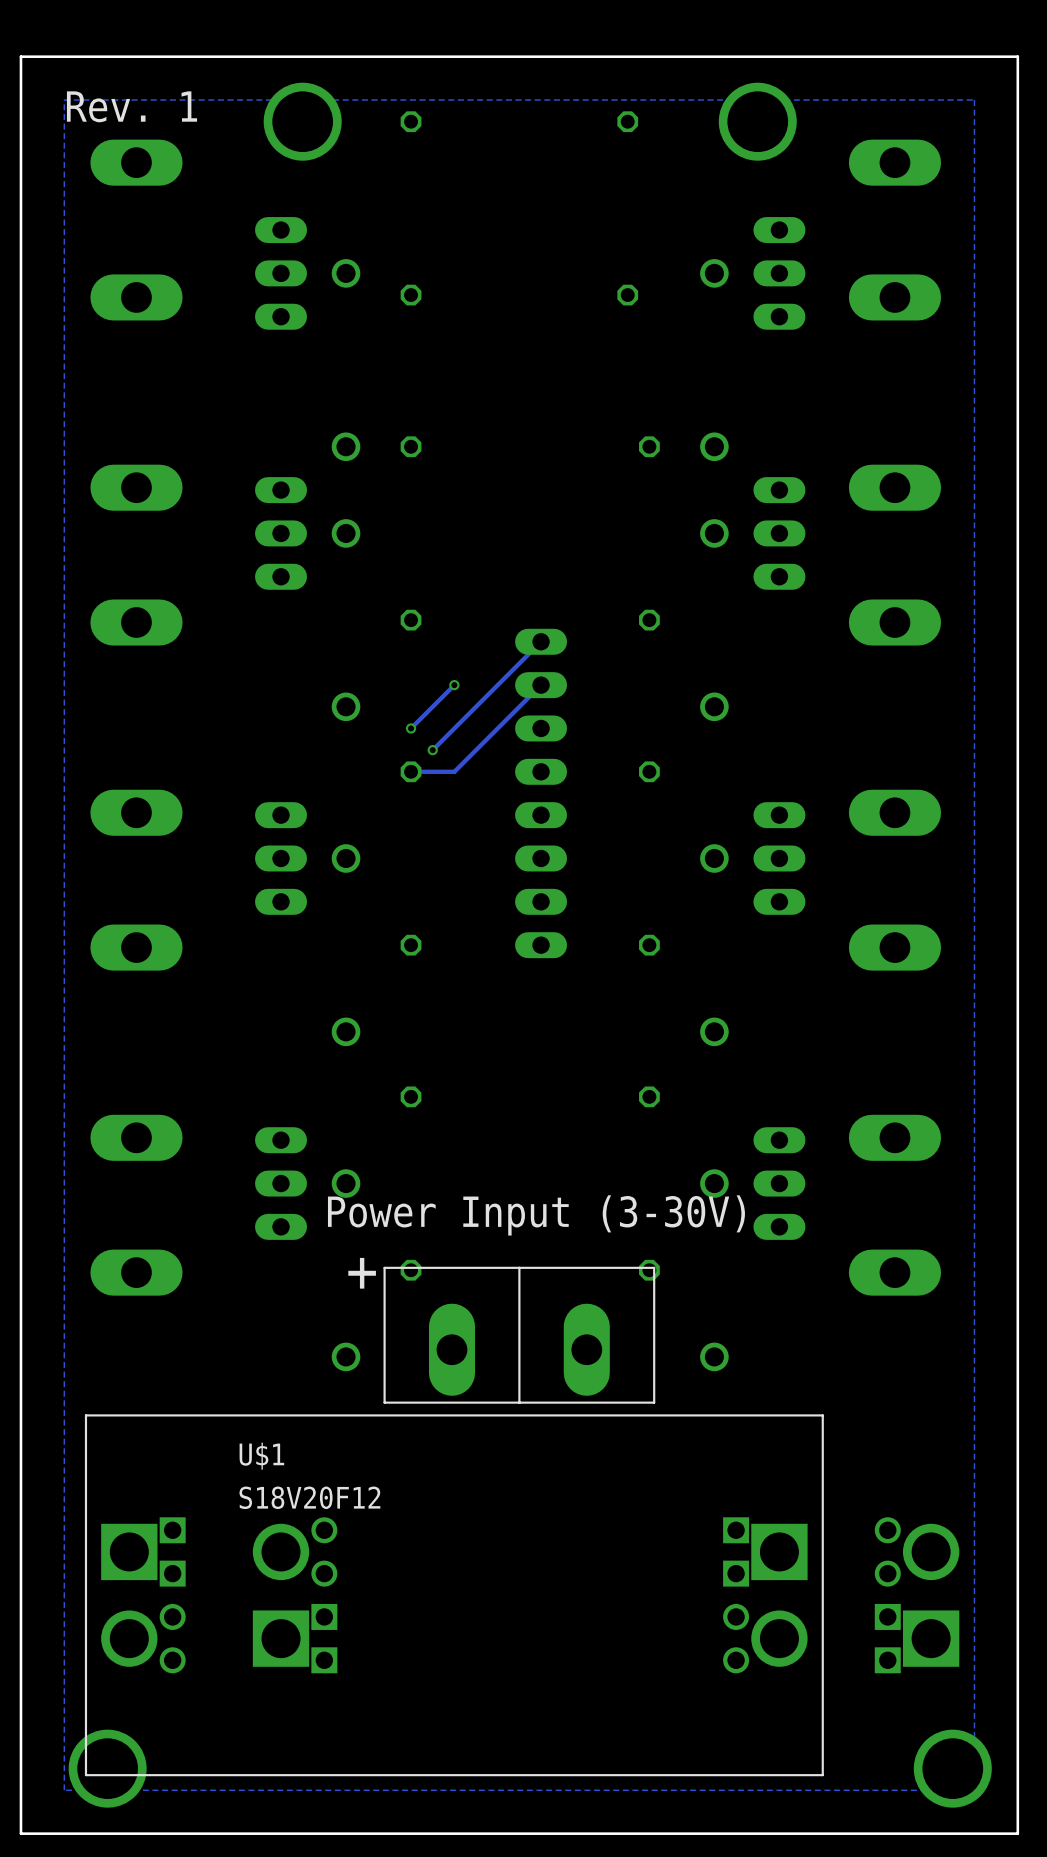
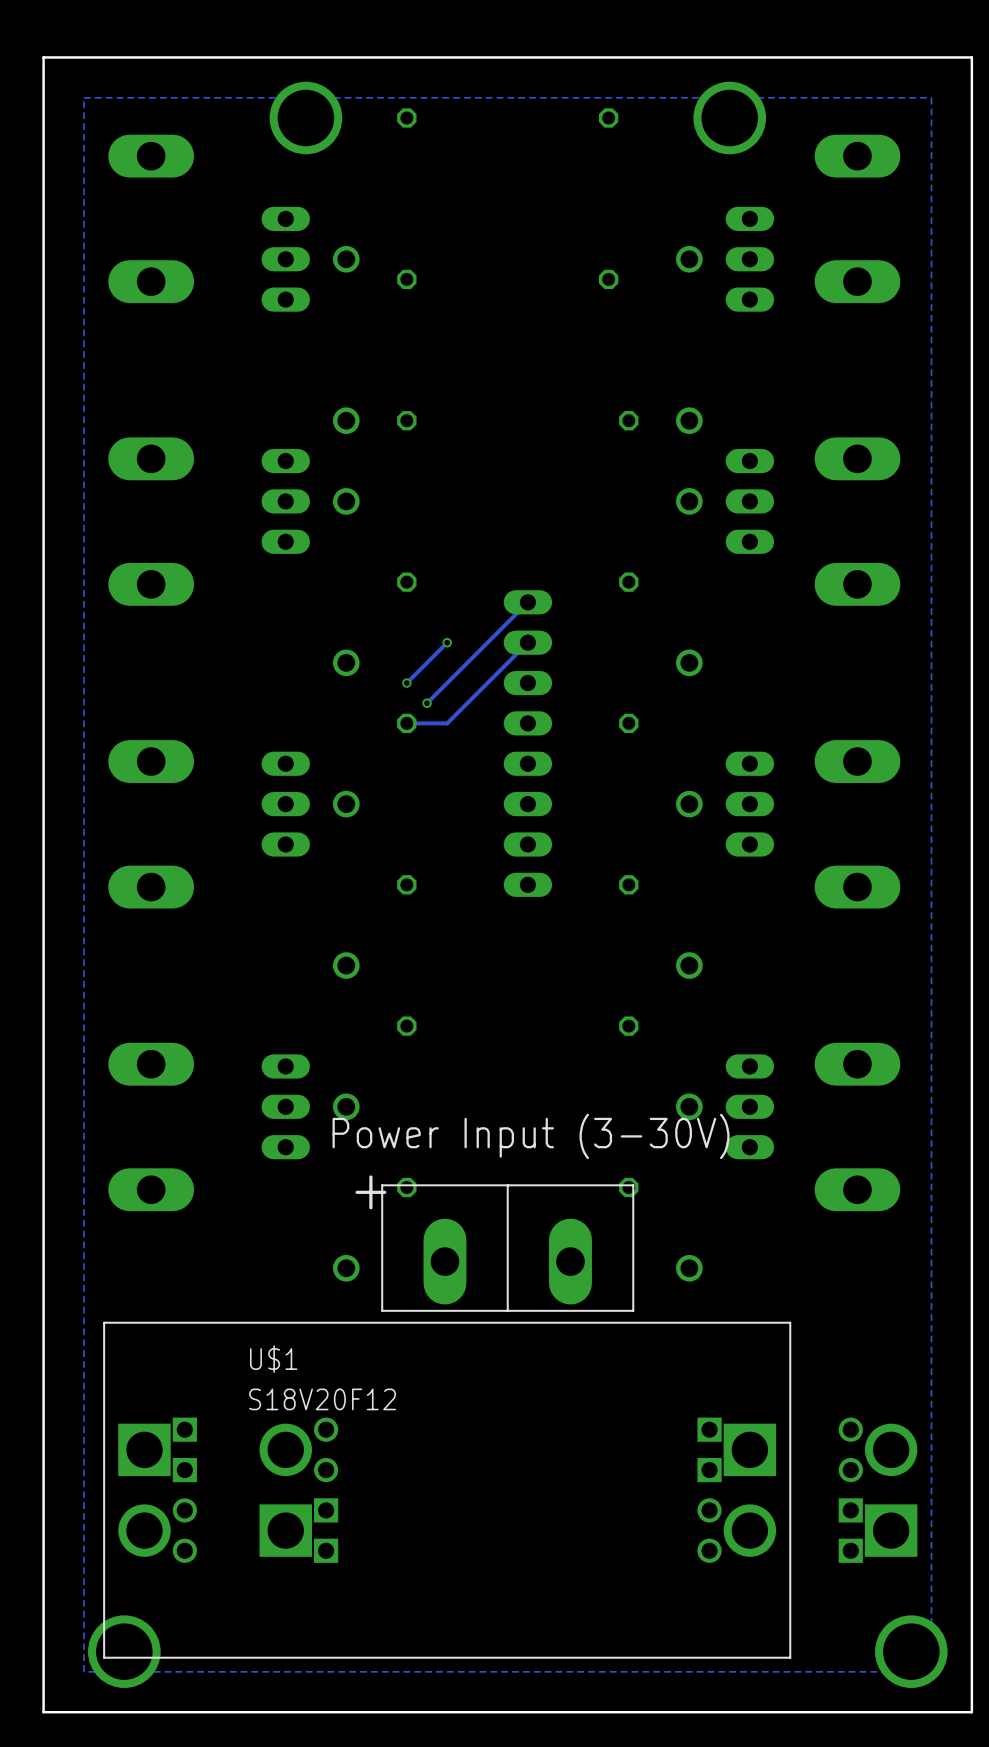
text: Rev. 1 (131, 106) -> none

